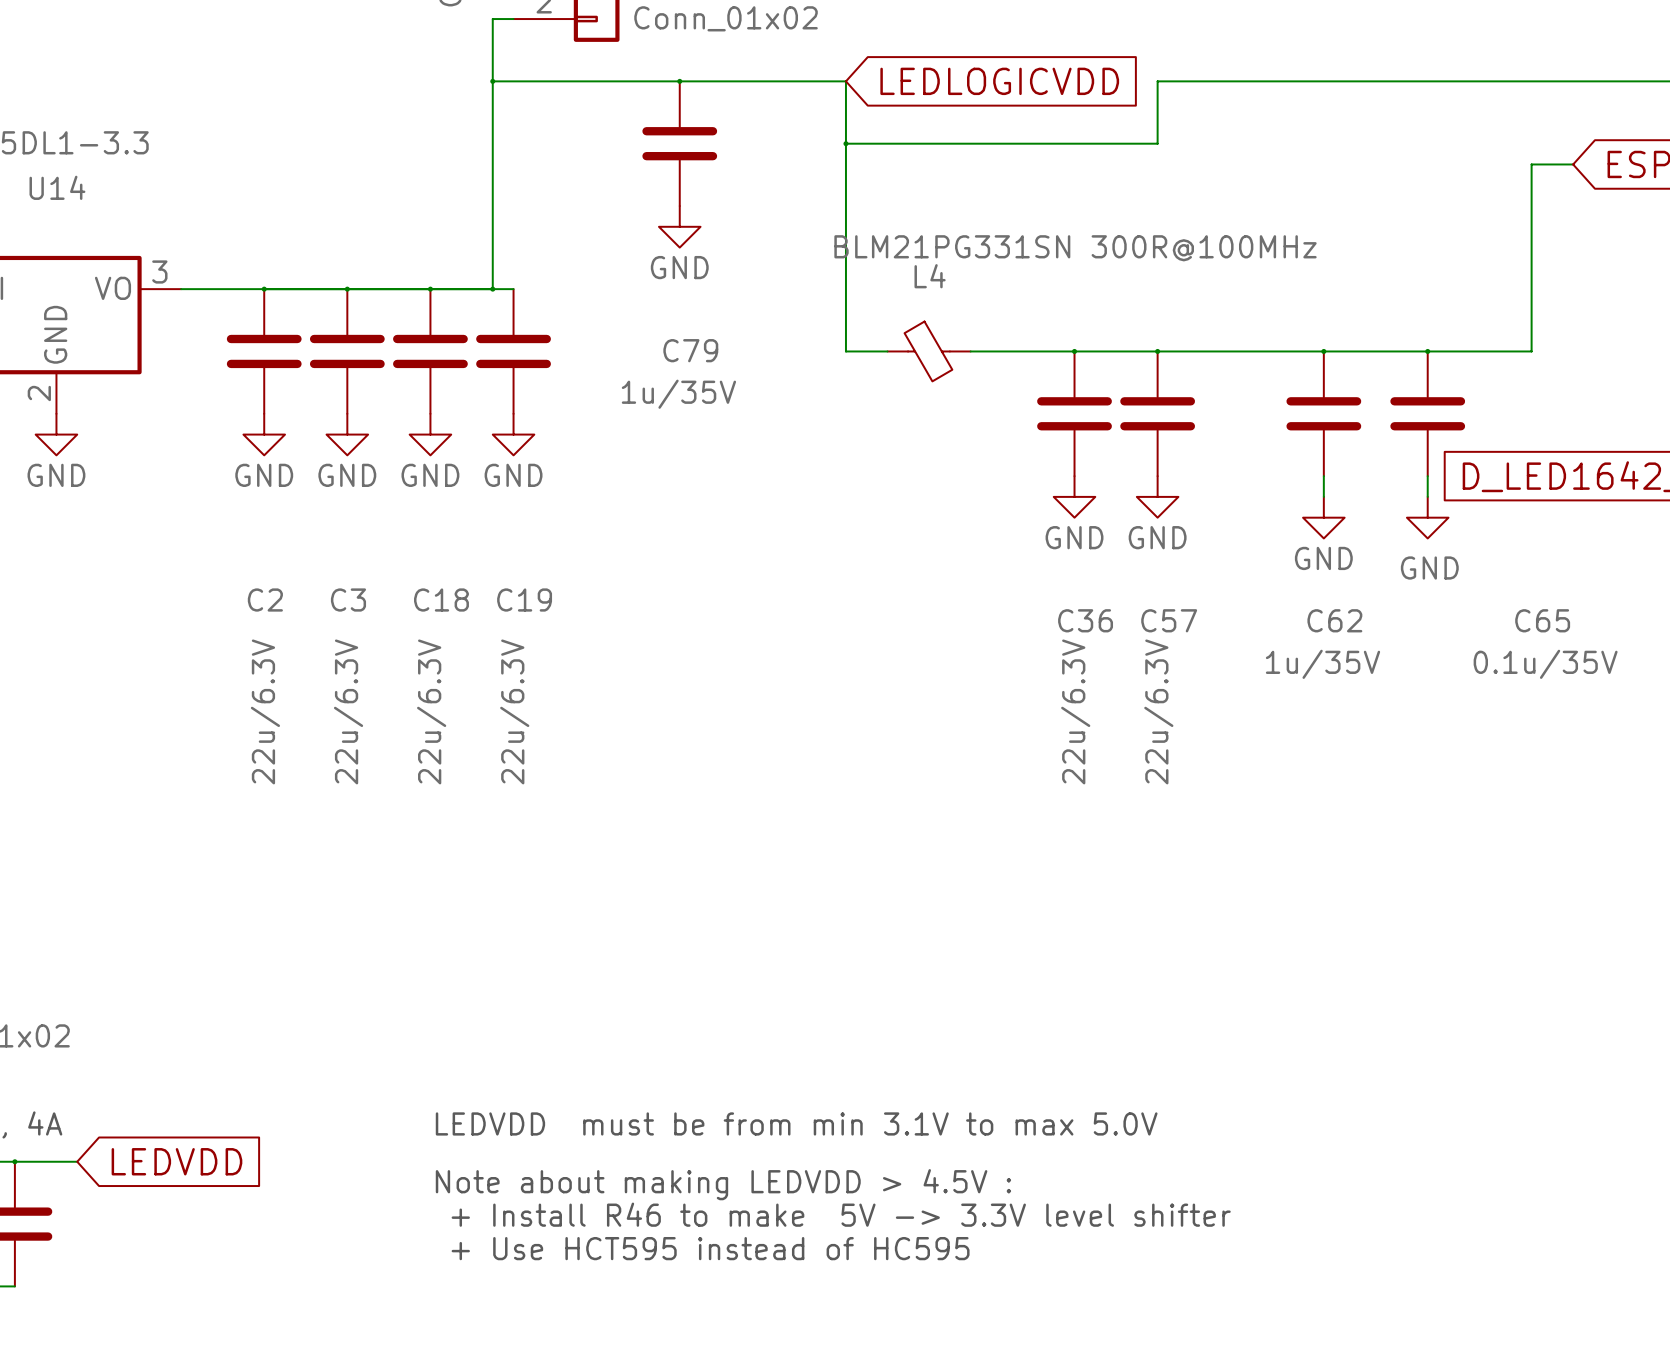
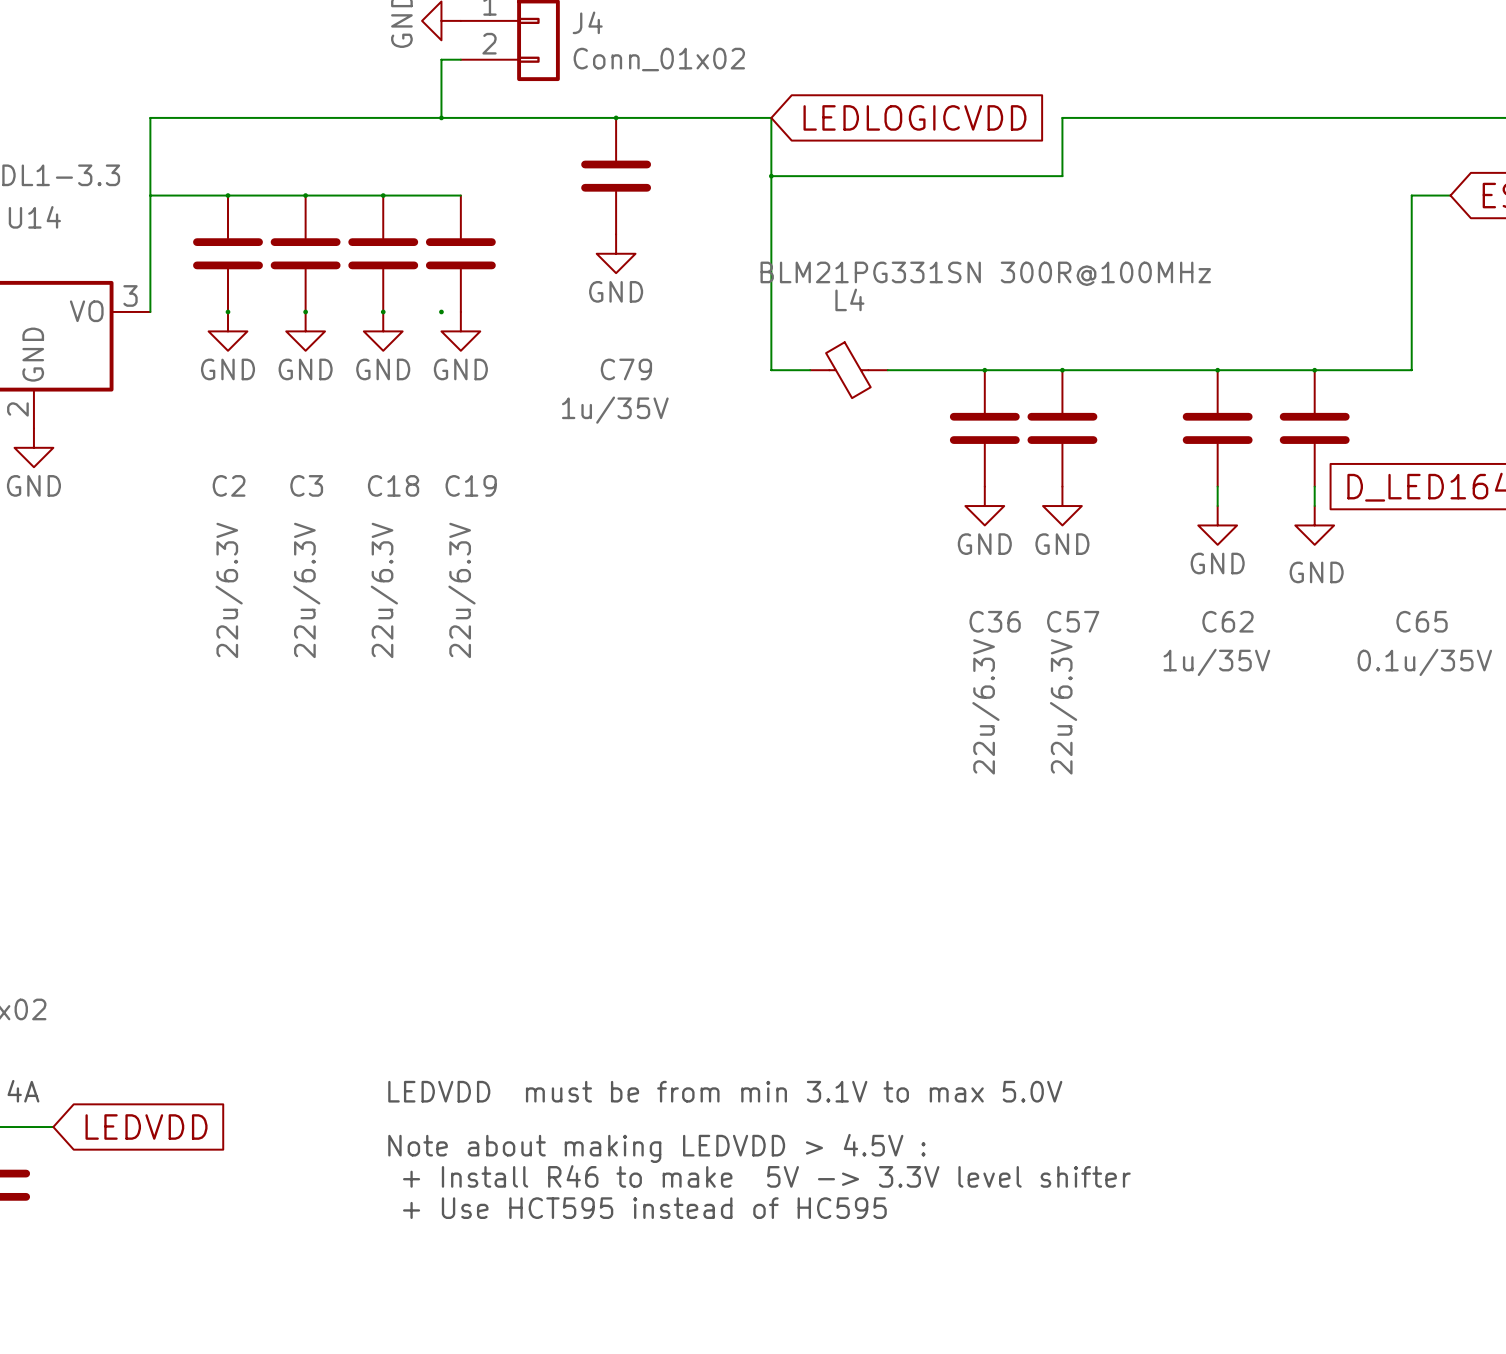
wire: (492, 81) (492, 289) -> none
wire: none -> (150, 195) (460, 195)
junction: none -> (228, 195)
junction: none -> (305, 195)
junction: none -> (383, 195)
wire: (181, 289) (513, 289) -> (150, 311) (150, 117) (441, 117)
power symbol: none -> GND (228, 331)
power symbol: none -> GND (305, 331)
power symbol: none -> GND (383, 331)
power symbol: none -> GND (460, 331)
C2 position: (264, 351) -> (228, 253)
C3 position: (347, 351) -> (305, 253)
C18 position: (430, 351) -> (383, 253)
C19 position: (513, 351) -> (460, 253)
power symbol: GND (264, 434) -> none
power symbol: GND (347, 434) -> none
power symbol: GND (430, 434) -> none
power symbol: GND (513, 434) -> none

